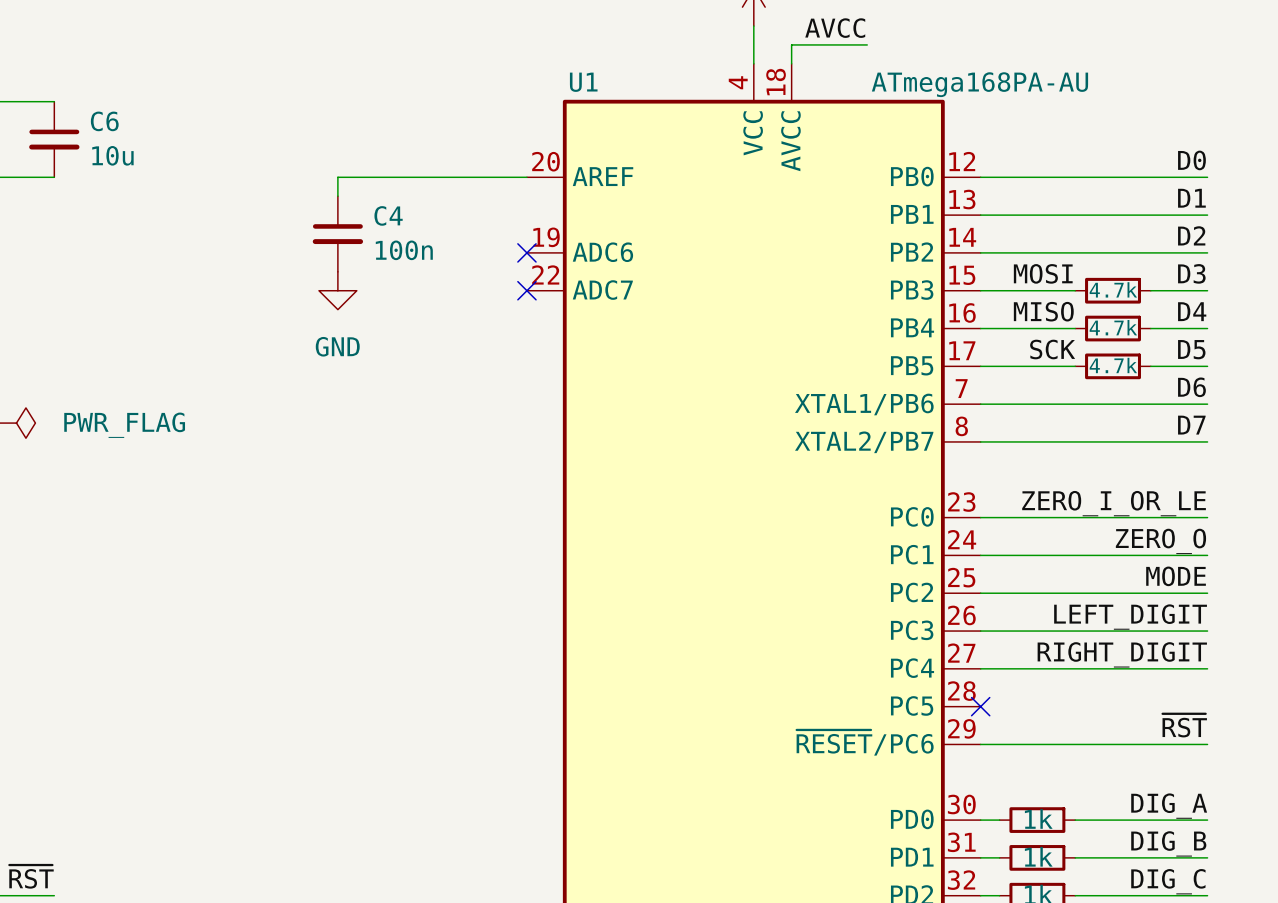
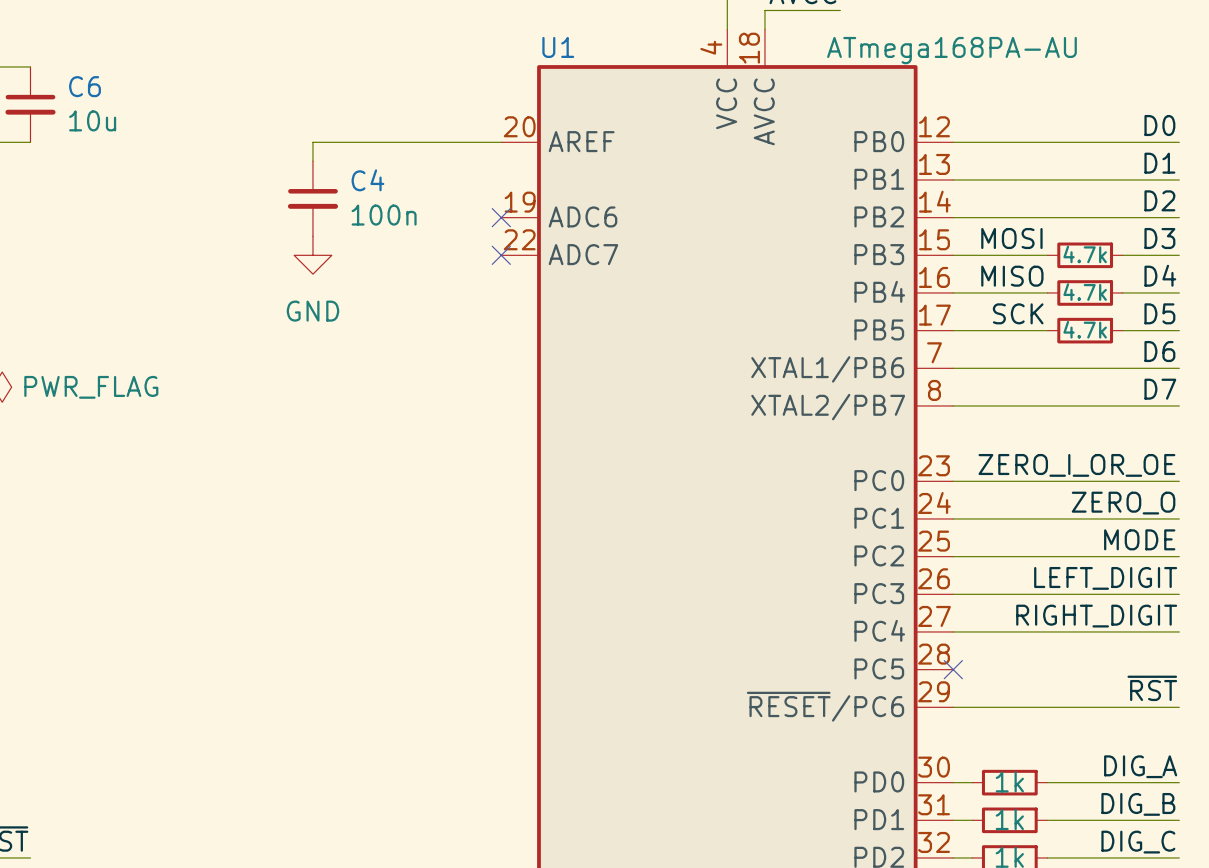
label: ZERO_I_OR_LE (1114, 503) -> ZERO_I_OR_OE (1076, 465)

